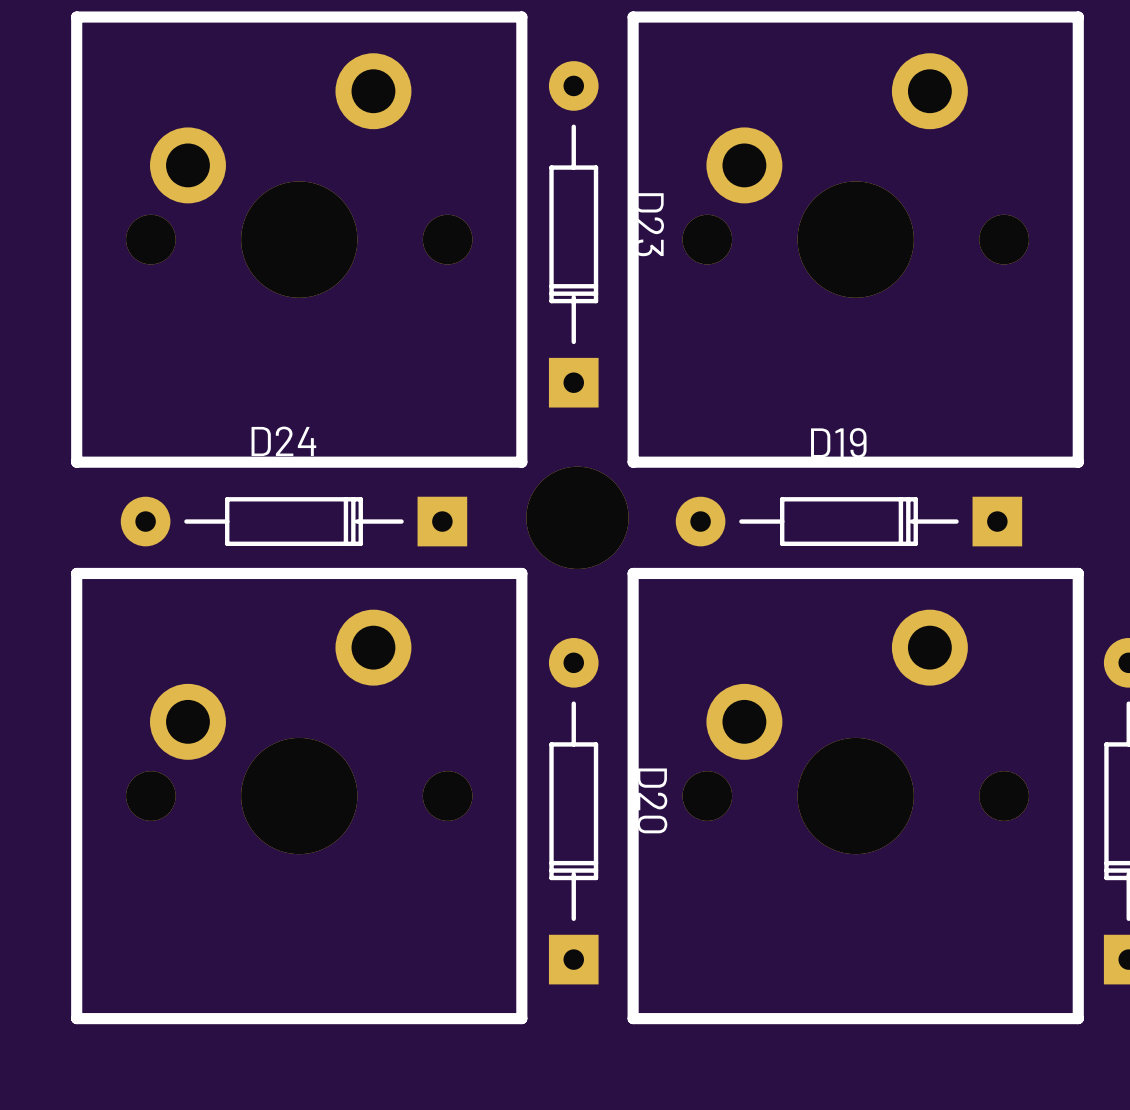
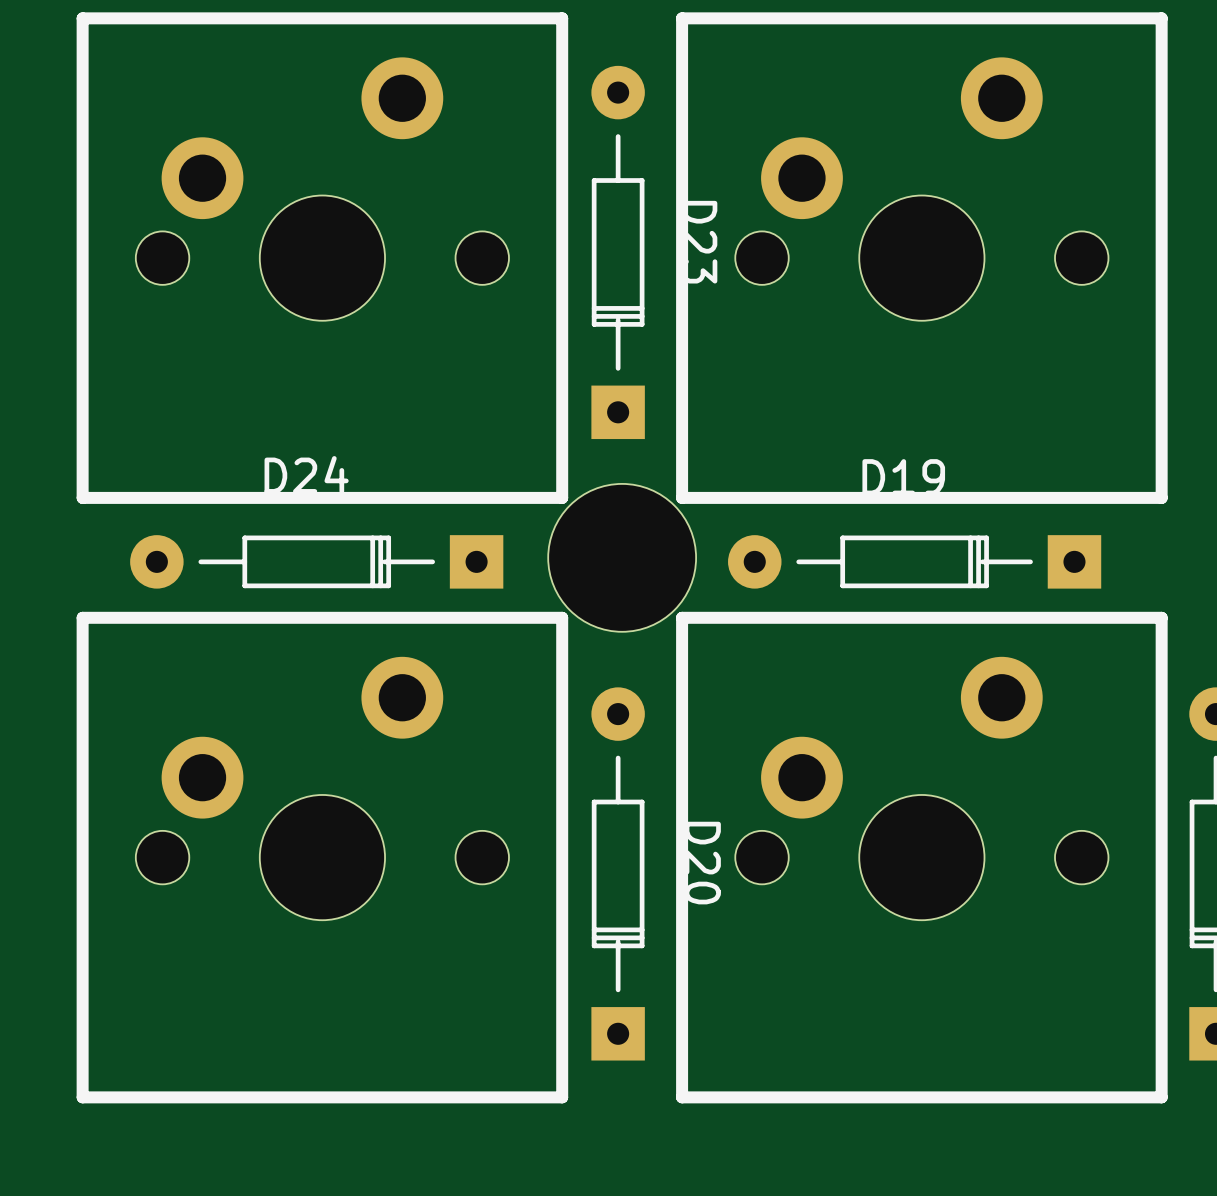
part footprint: [71, 11, 528, 468] -> [76, 12, 569, 504]
part footprint: [627, 11, 1084, 468] -> [676, 12, 1168, 504]
part footprint: [526, 466, 629, 569] -> [548, 483, 697, 632]
part footprint: [71, 567, 528, 1025] -> [76, 611, 569, 1104]
part footprint: [627, 567, 1084, 1025] -> [676, 611, 1168, 1104]

